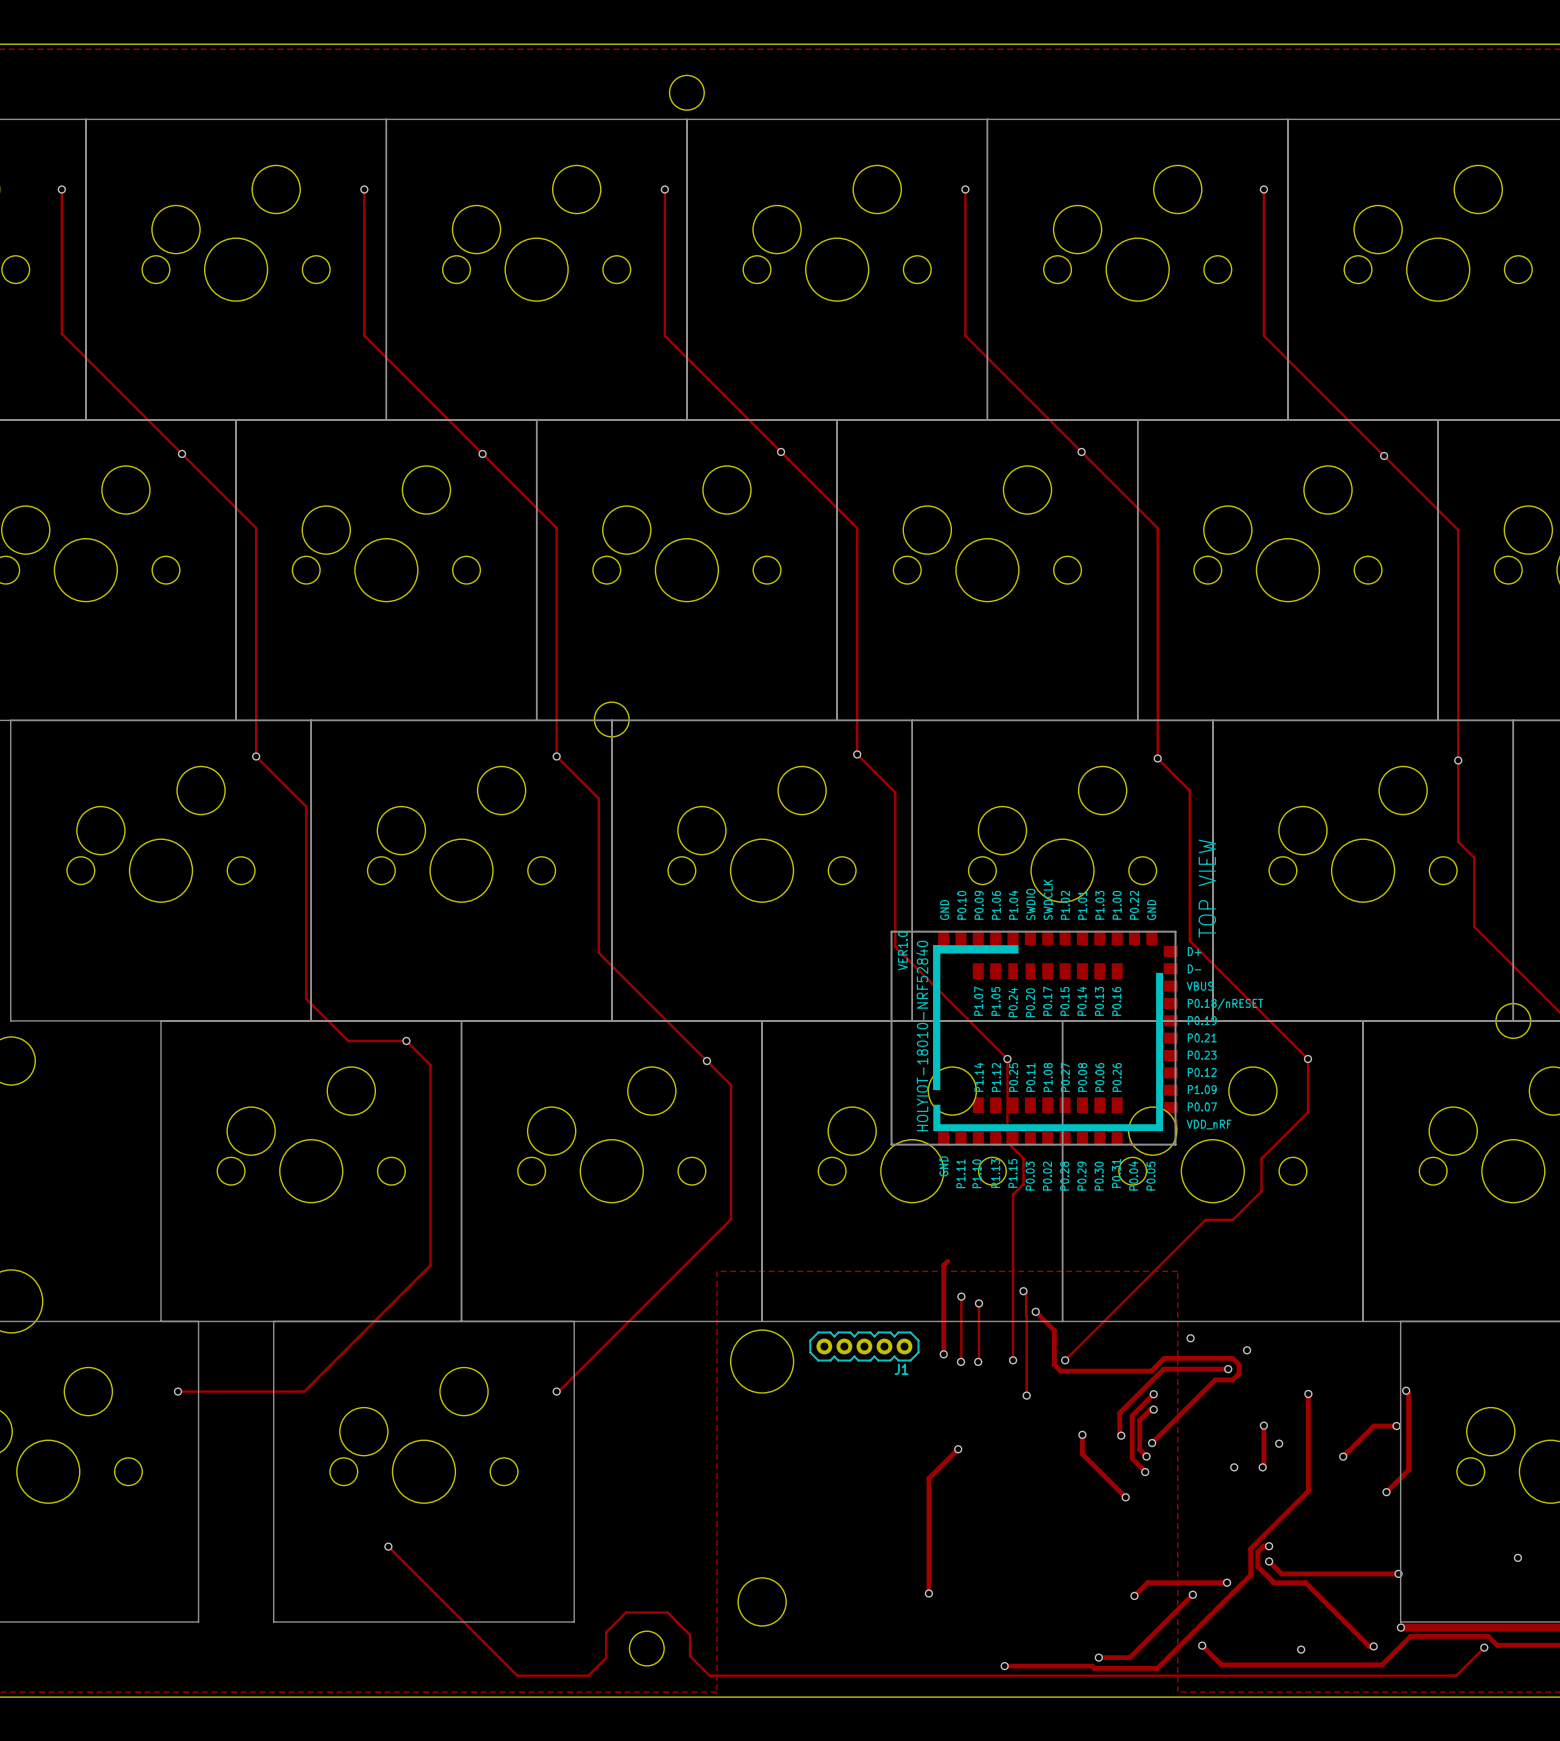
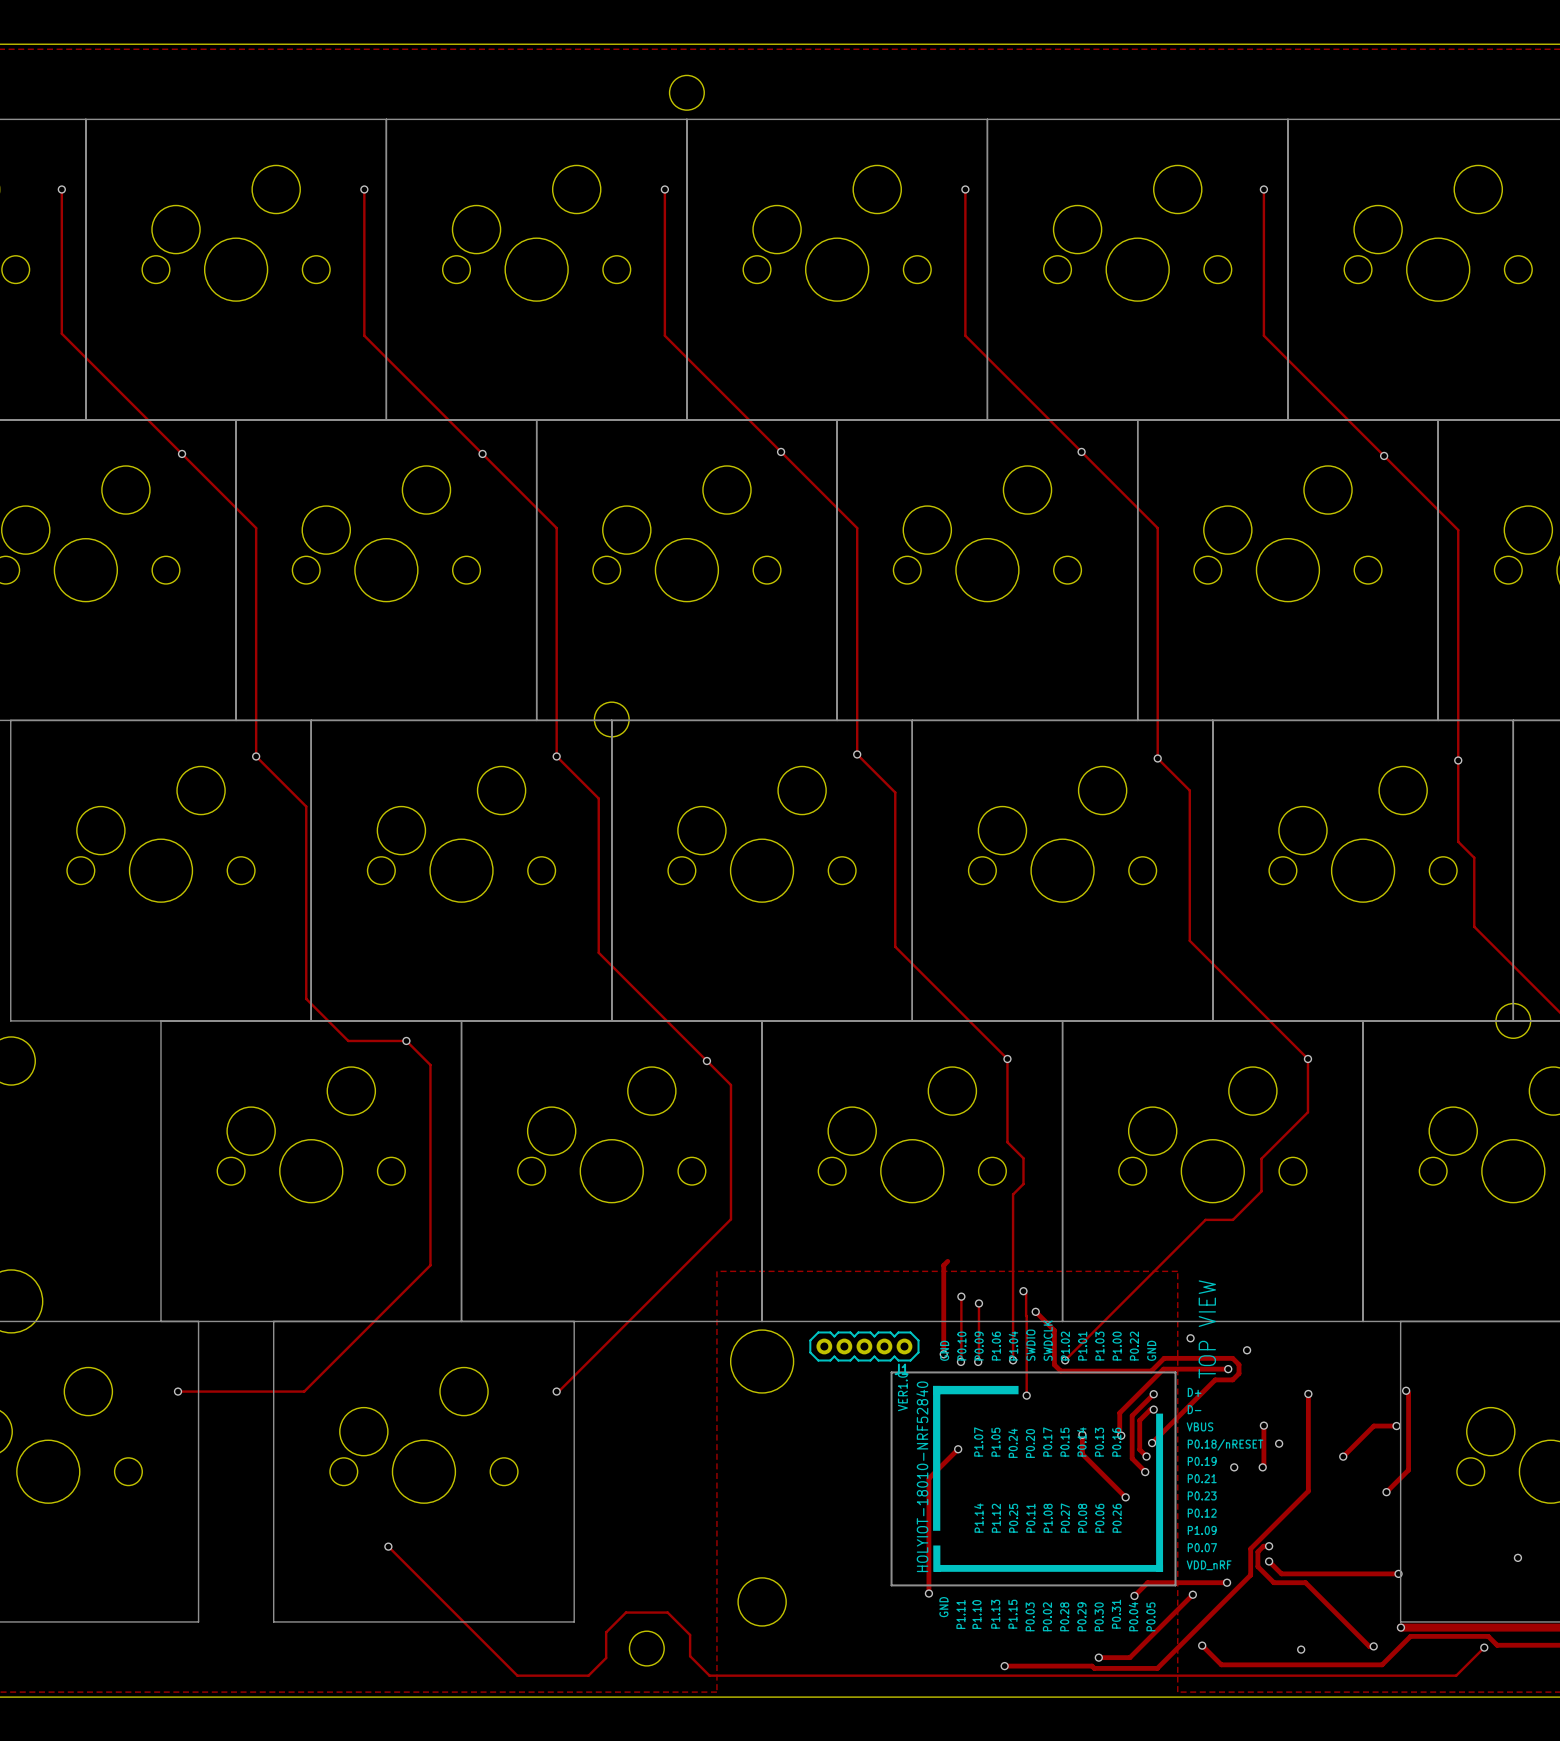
part: (1034, 1038) -> none
part: none -> (1033, 1478)

